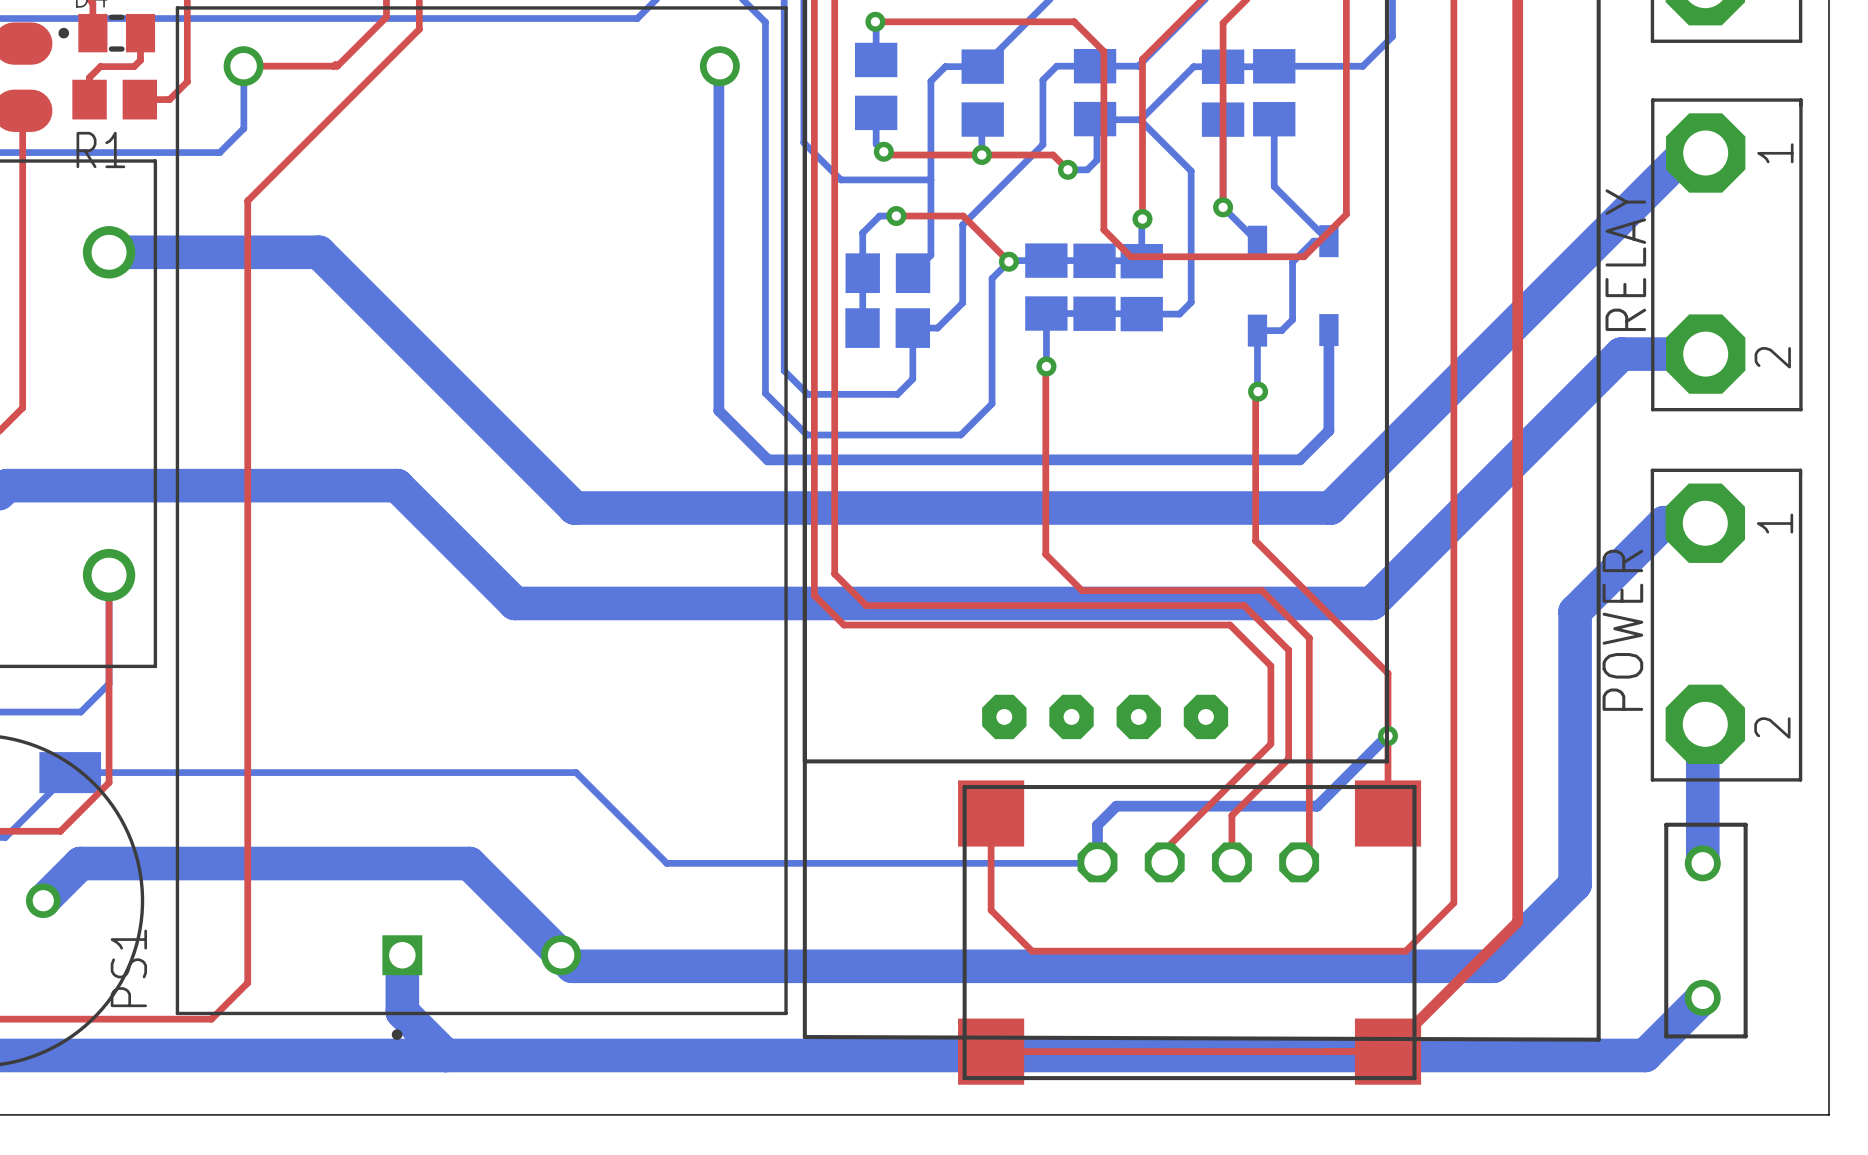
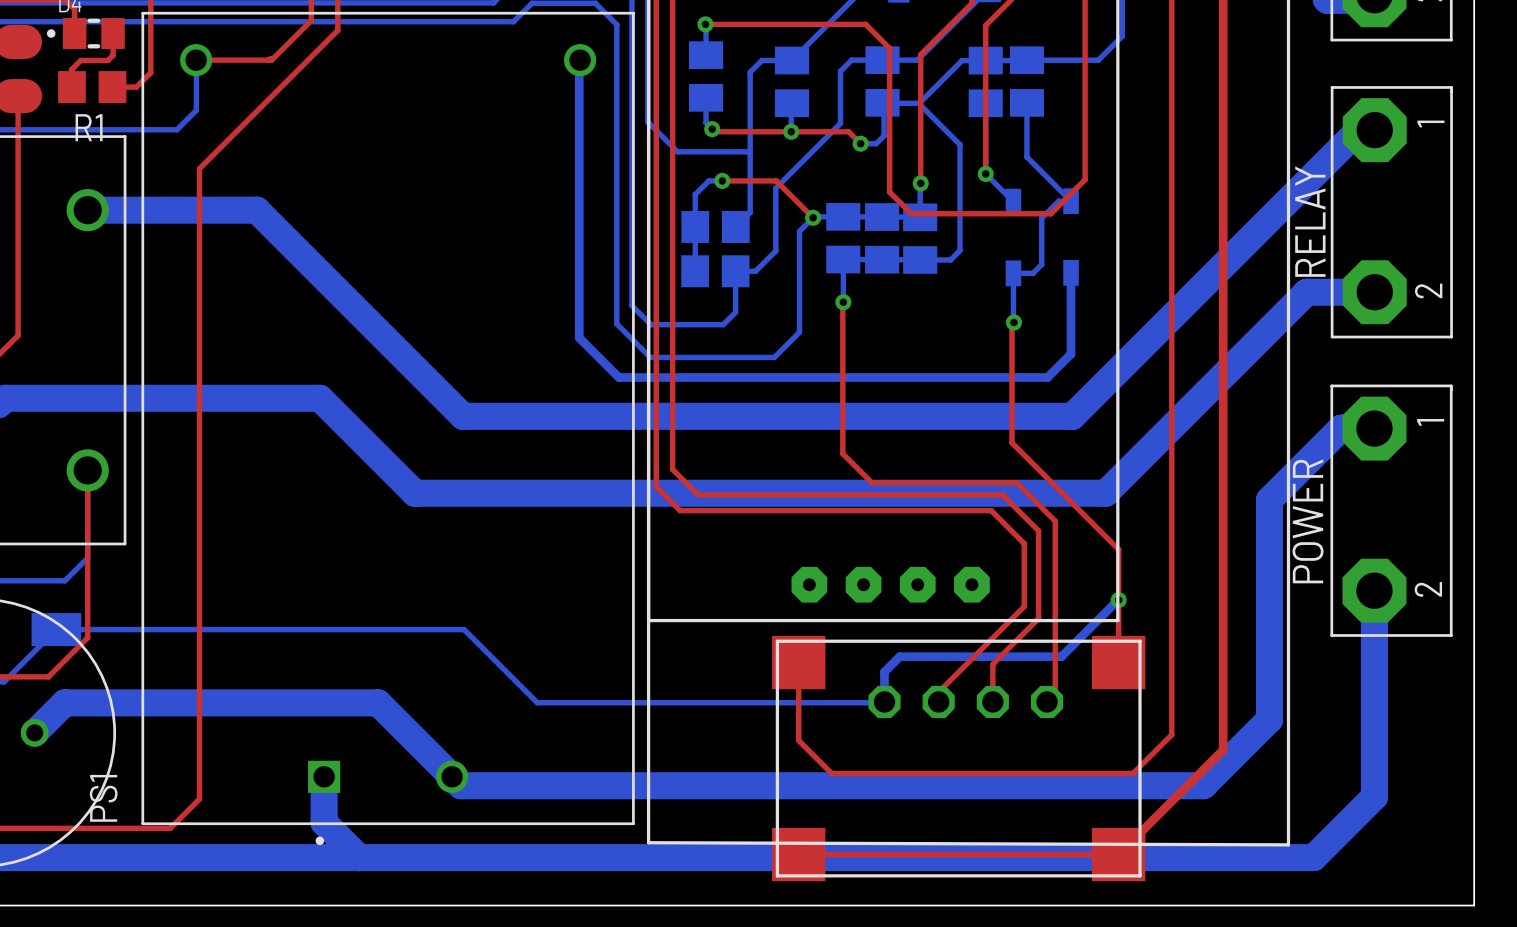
bottom track: (1705, 724) (1702, 726) (1702, 863) -> (1374, 590) (1374, 796) (1313, 857)
part: (1705, 930) -> none
bottom track: (1702, 997) (1645, 1055) (1629, 1055) -> none

